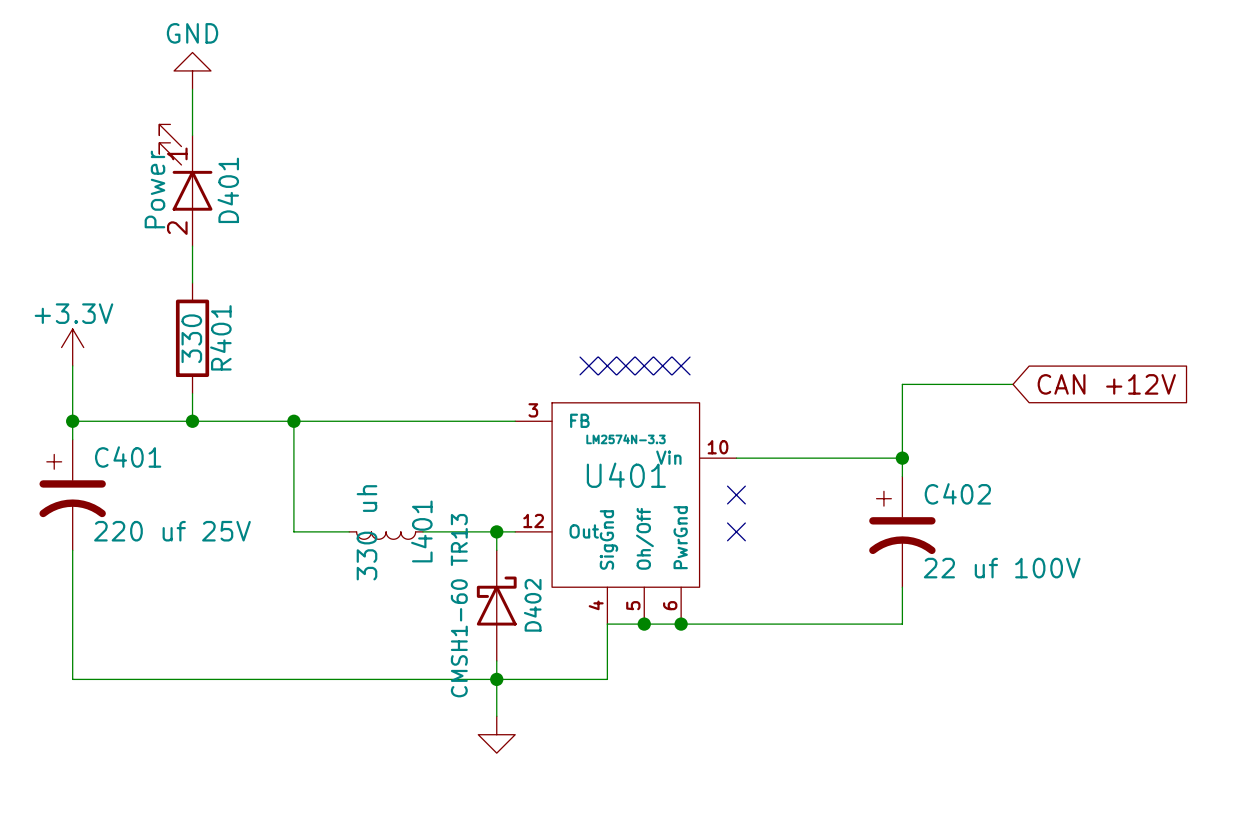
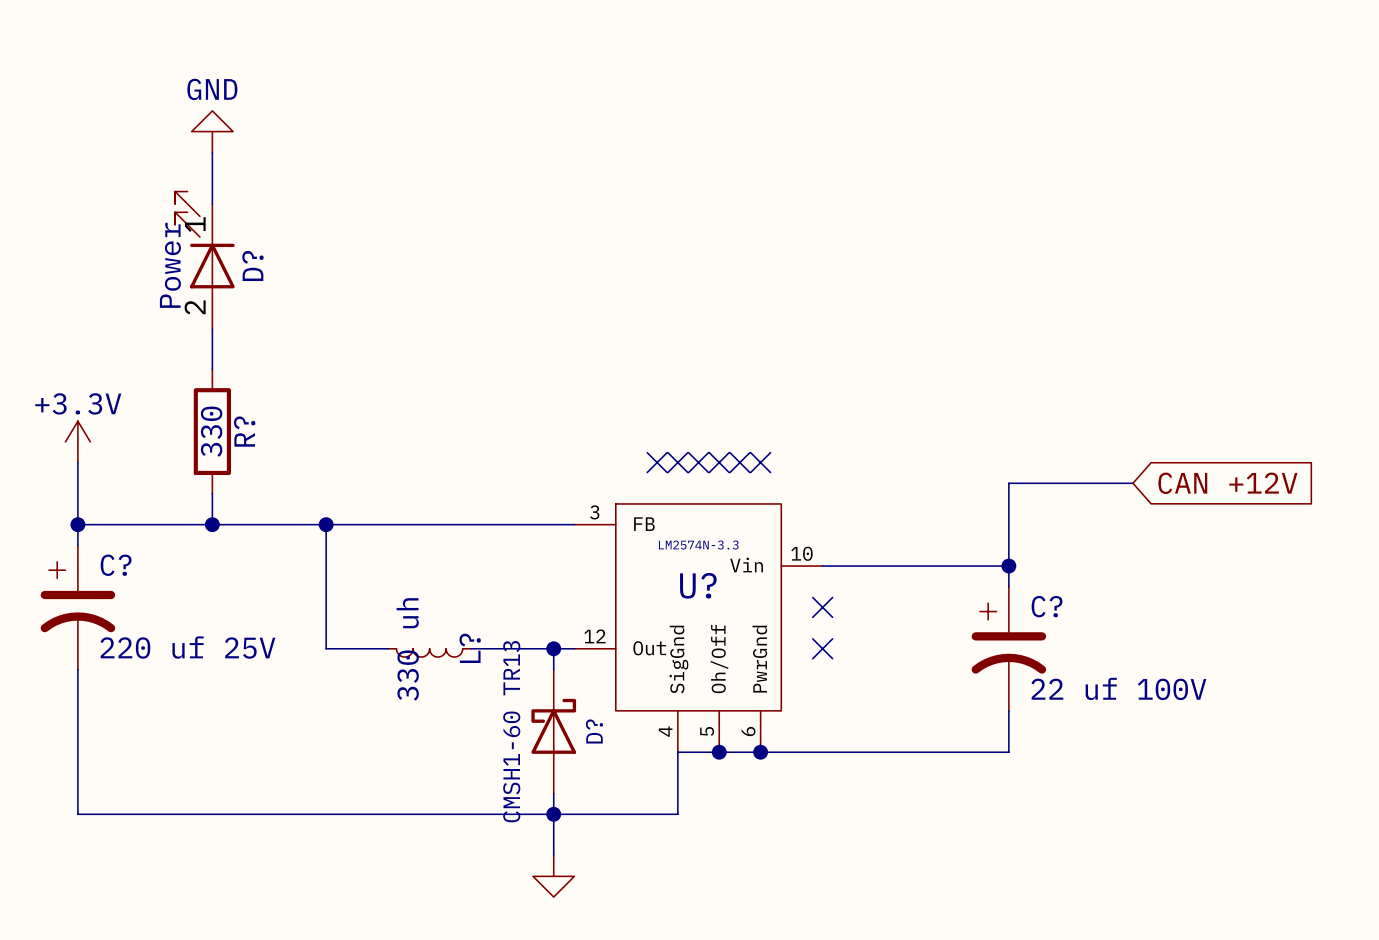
D401 name: D401 (228, 190) -> D? (252, 265)
R401 name: R401 (220, 337) -> R? (244, 431)
C401 name: C401 (128, 457) -> C? (116, 565)
U401 name: U401 (626, 475) -> U? (698, 585)
C402 name: C402 (957, 493) -> C? (1047, 606)
L401 name: L401 (421, 531) -> L? (470, 648)
D402 name: D402 (532, 605) -> D? (594, 731)

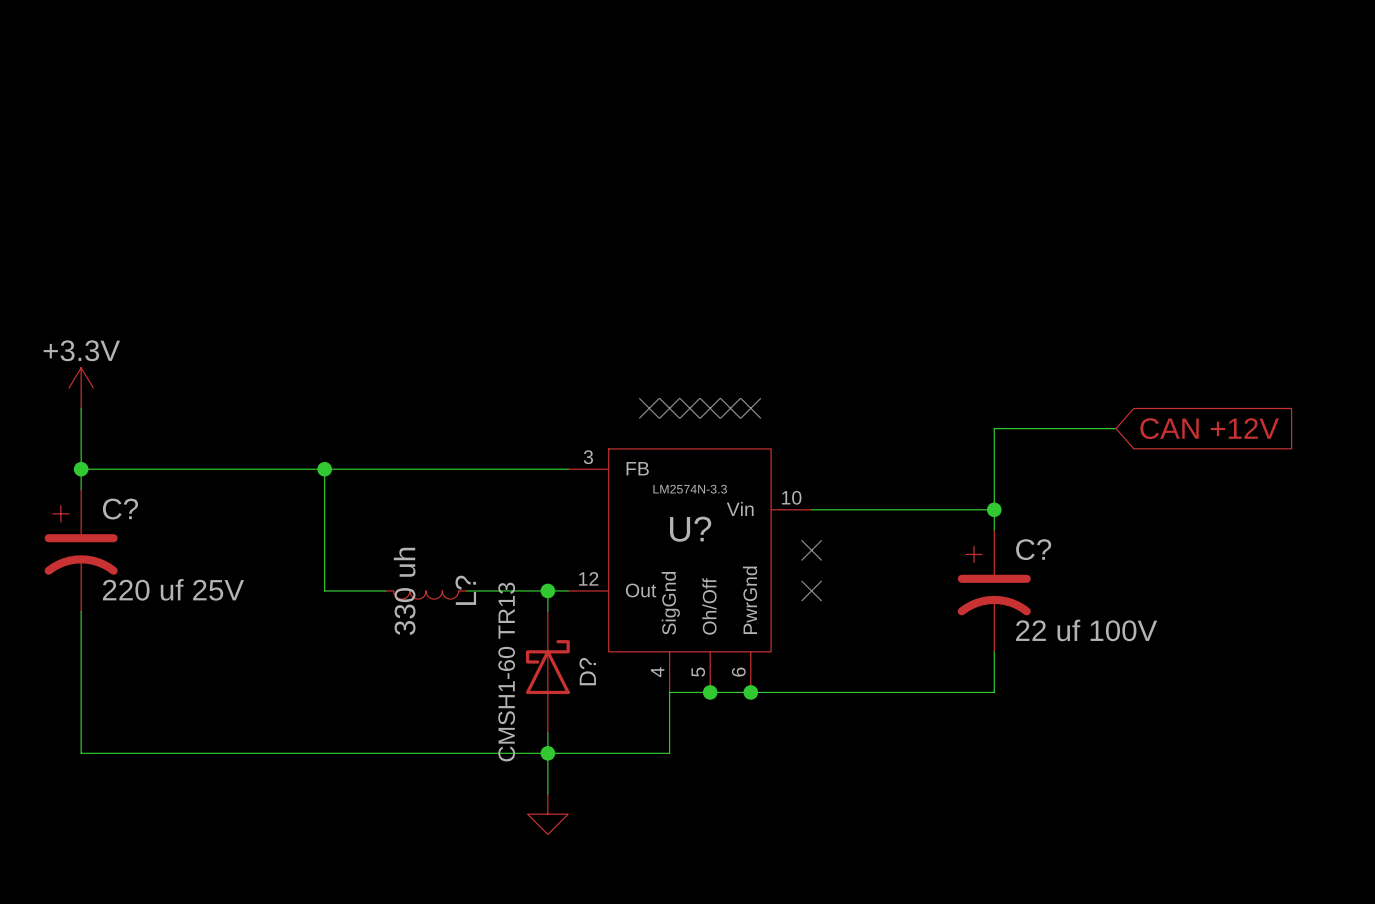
power symbol: GND (212, 131) -> none
wire: (212, 152) (212, 204) -> none
D?: Power (204, 259) -> none
wire: (212, 328) (212, 369) -> none
R?: 330 (212, 431) -> none
wire: (212, 493) (212, 524) -> none
junction: (212, 524) -> none

